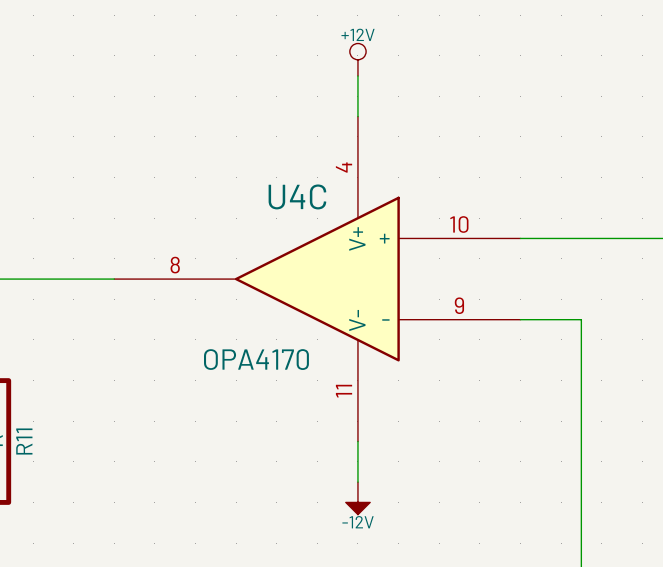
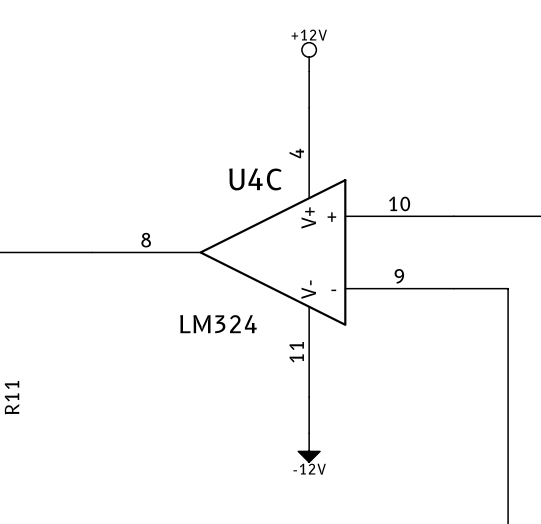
U4C value: OPA4170 (256, 359) -> LM324 (218, 324)

